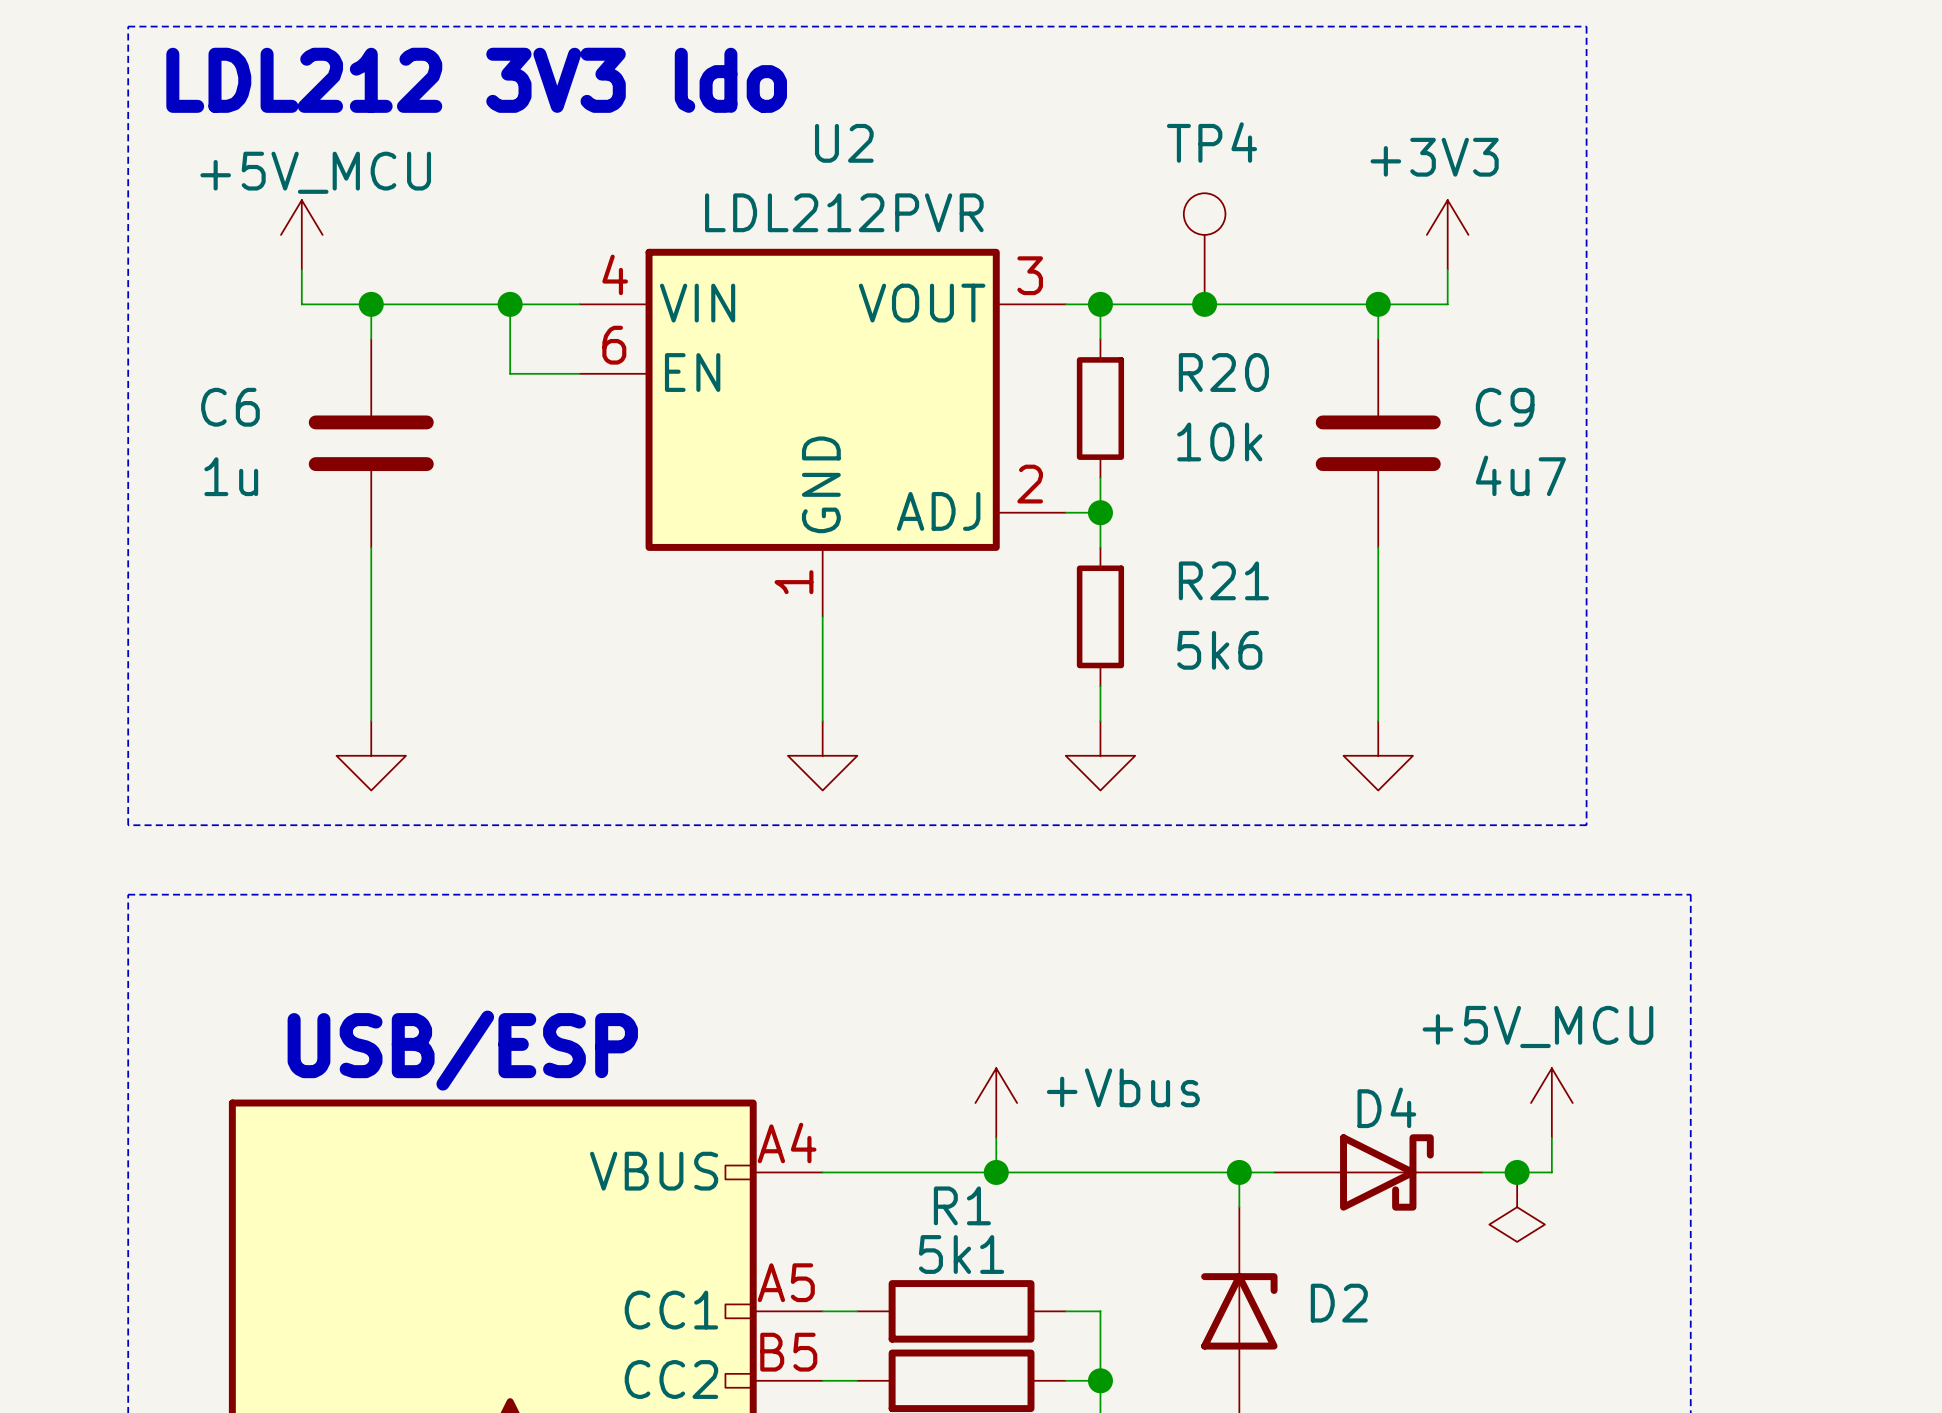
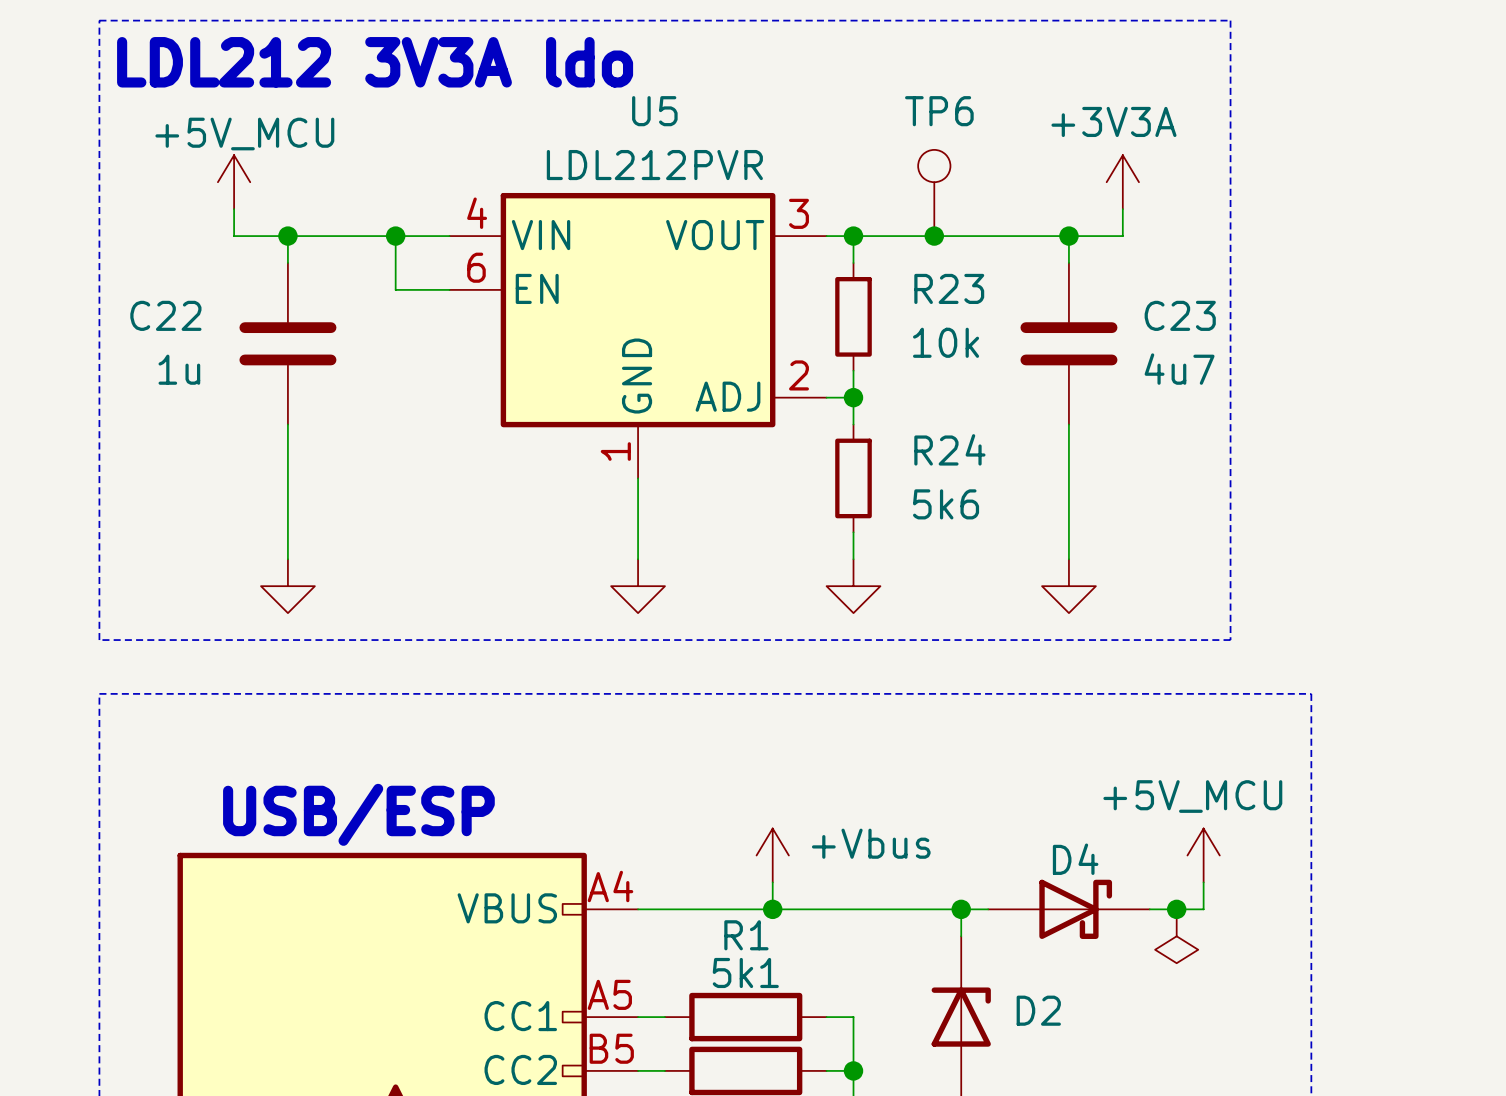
text: LDL212 3V3 ldo (476, 80) -> LDL212 3V3A ldo (375, 62)
TP4 name: TP4 (1211, 142) -> TP6 (939, 111)
U2 name: U2 (844, 143) -> U5 (654, 111)
power symbol: +3V3 (1447, 234) -> +3V3A (1122, 182)
R20 name: R20 (1223, 372) -> R23 (949, 288)
C6 name: C6 (230, 407) -> C22 (165, 315)
C9 name: C9 (1505, 407) -> C23 (1180, 315)
R21 name: R21 (1223, 580) -> R24 (949, 449)

